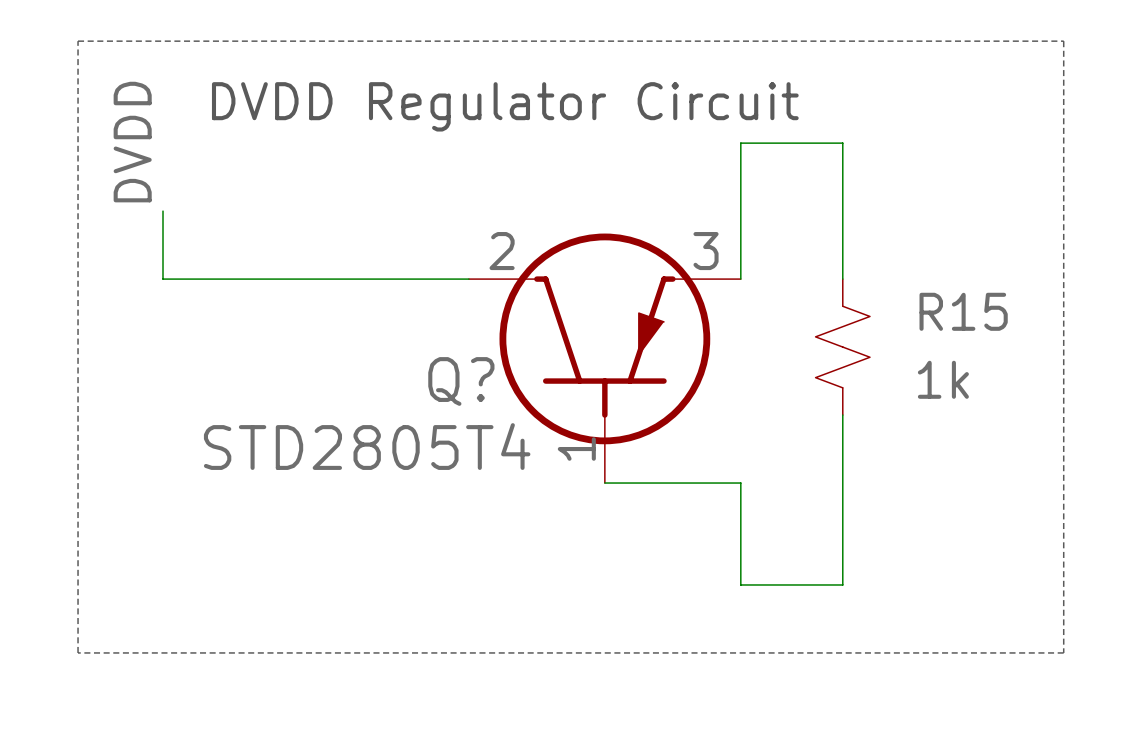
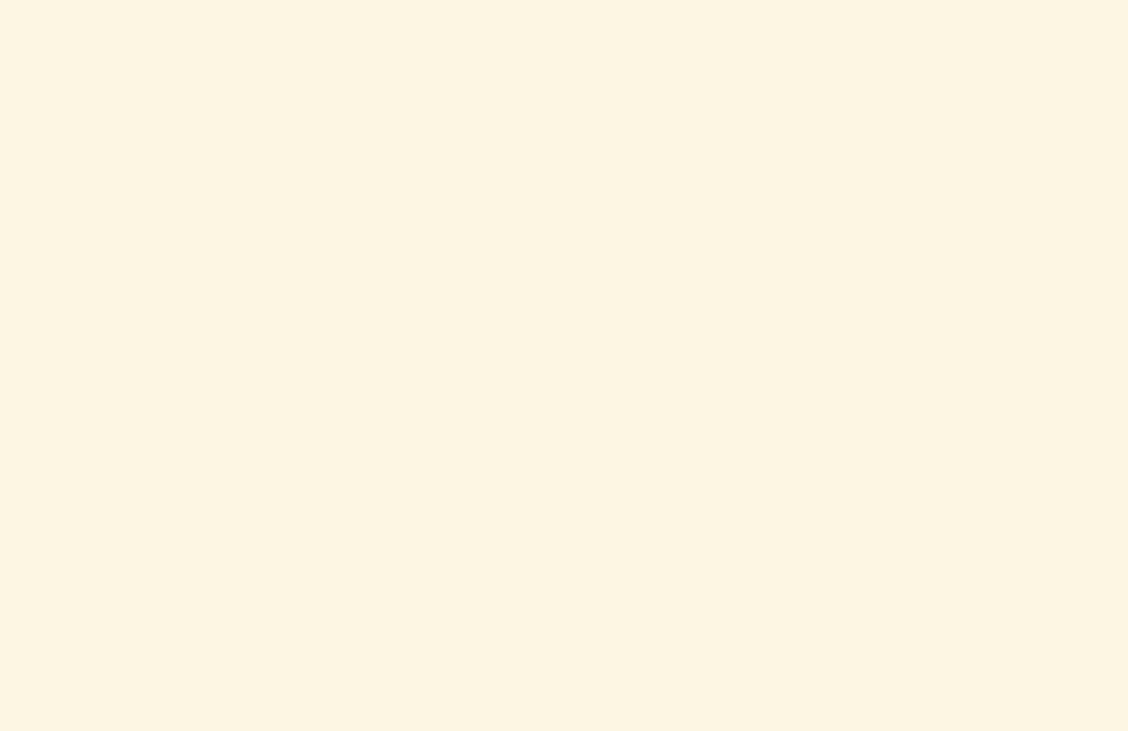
line: (78, 41) (1063, 41) (1063, 652) (78, 652) (78, 41) -> none
text: DVDD Regulator Circuit (505, 106) -> none
label: DVDD (132, 142) -> none
wire: (163, 211) (163, 279) (468, 279) -> none
wire: (740, 279) (740, 143) (842, 143) (842, 279) -> none
R15: 1k (842, 347) -> none
Q?: STD2805T4 (604, 358) -> none
wire: (842, 415) (842, 584) (740, 584) (740, 483) (604, 483) -> none

